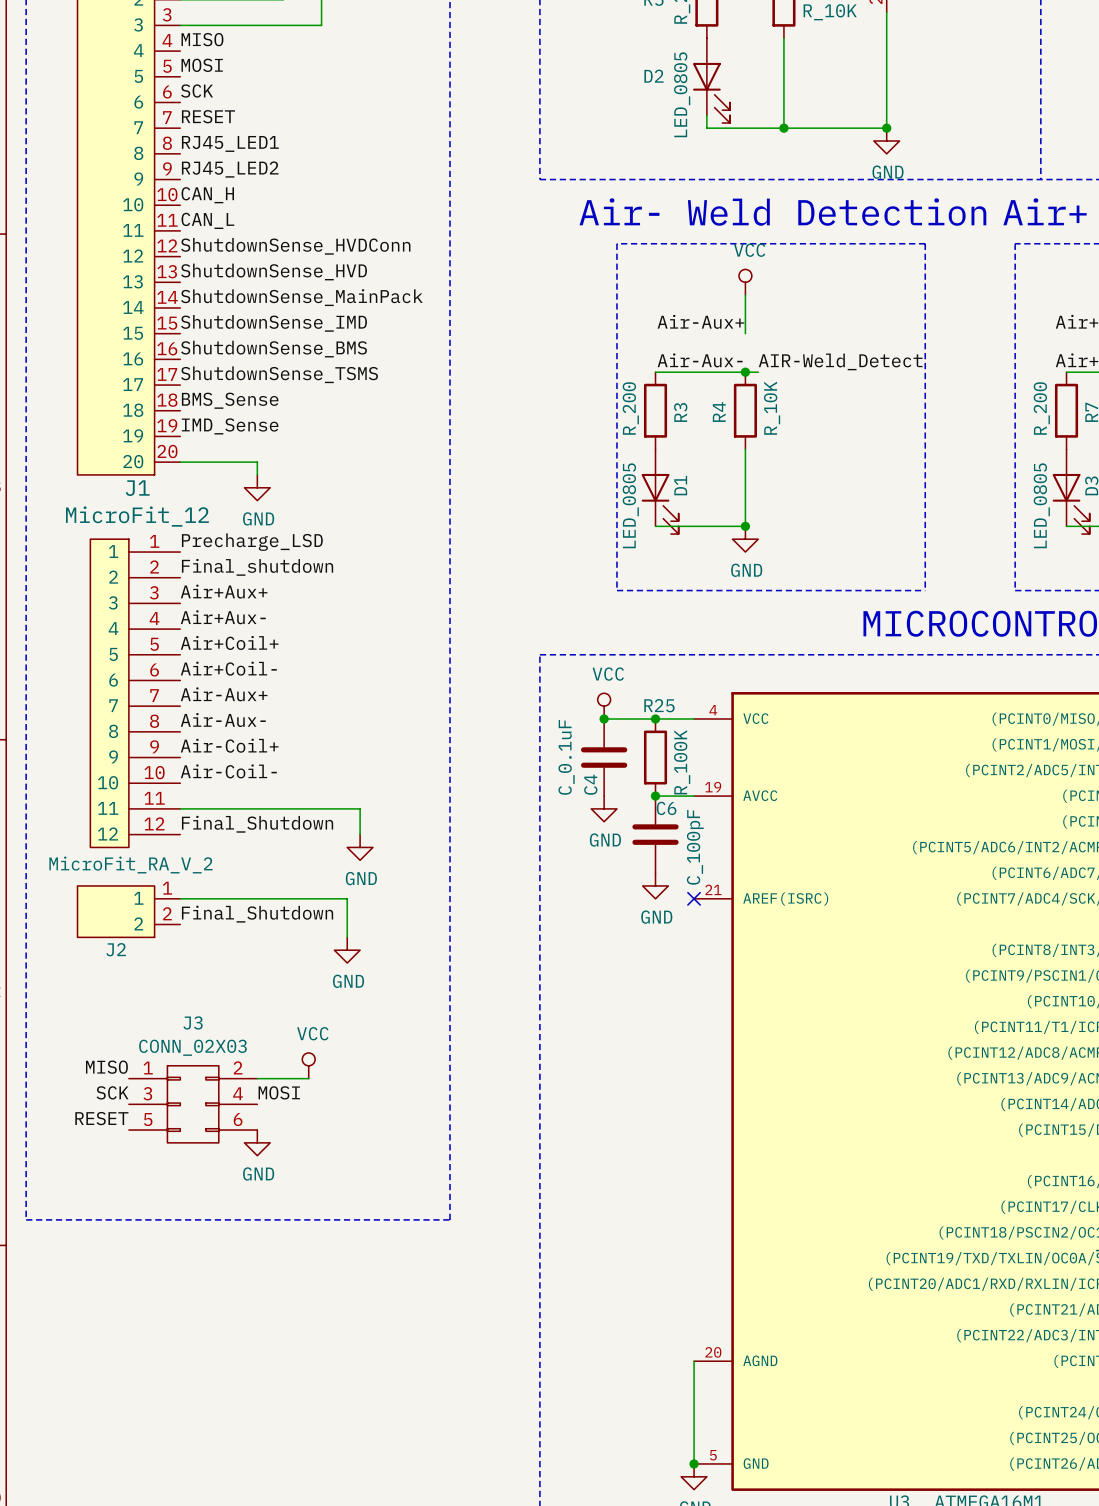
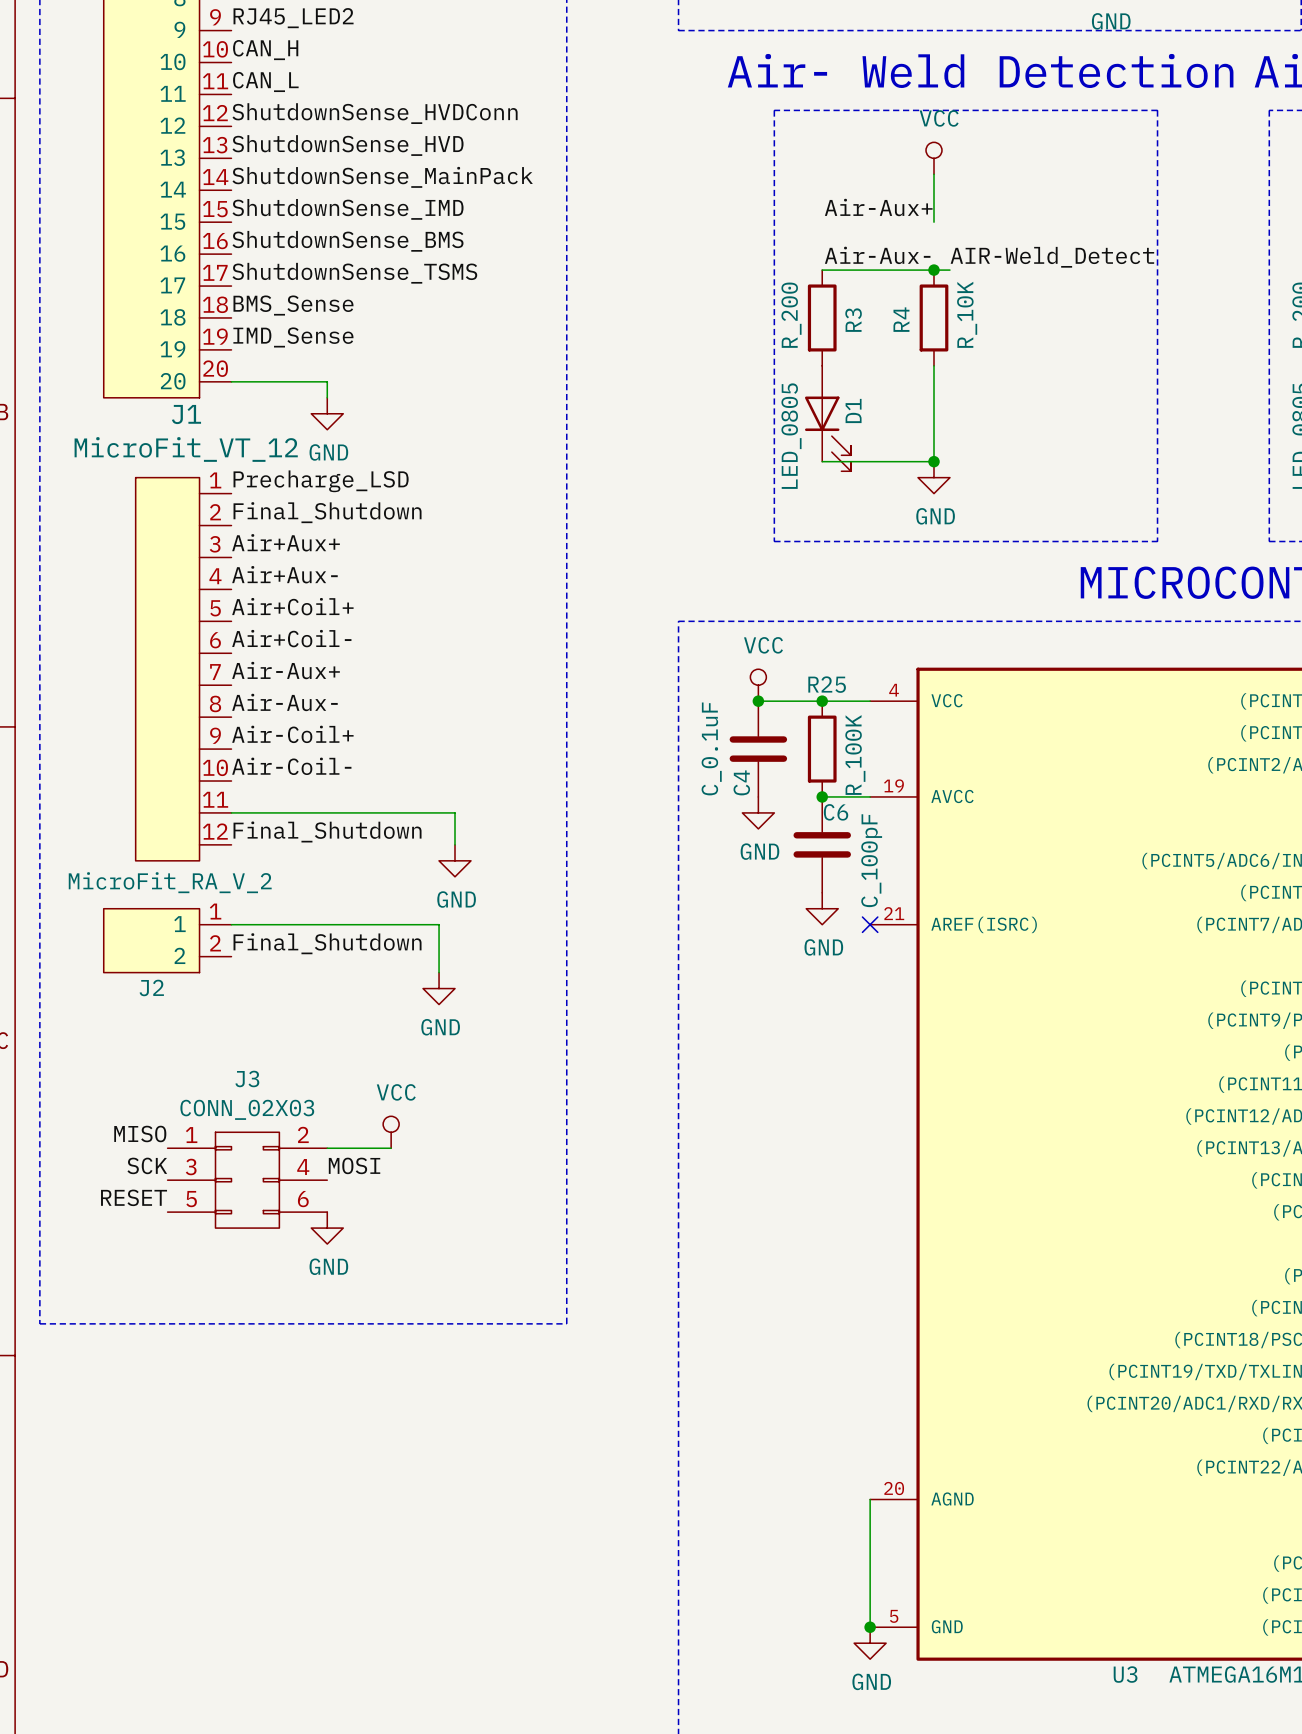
J1 value: MicroFit_12 (137, 516) -> MicroFit_VT_12 (186, 449)
J1 symbol: [90, 539, 181, 848] -> [135, 477, 232, 861]
label: Final_shutdown (257, 567) -> Final_Shutdown (327, 512)

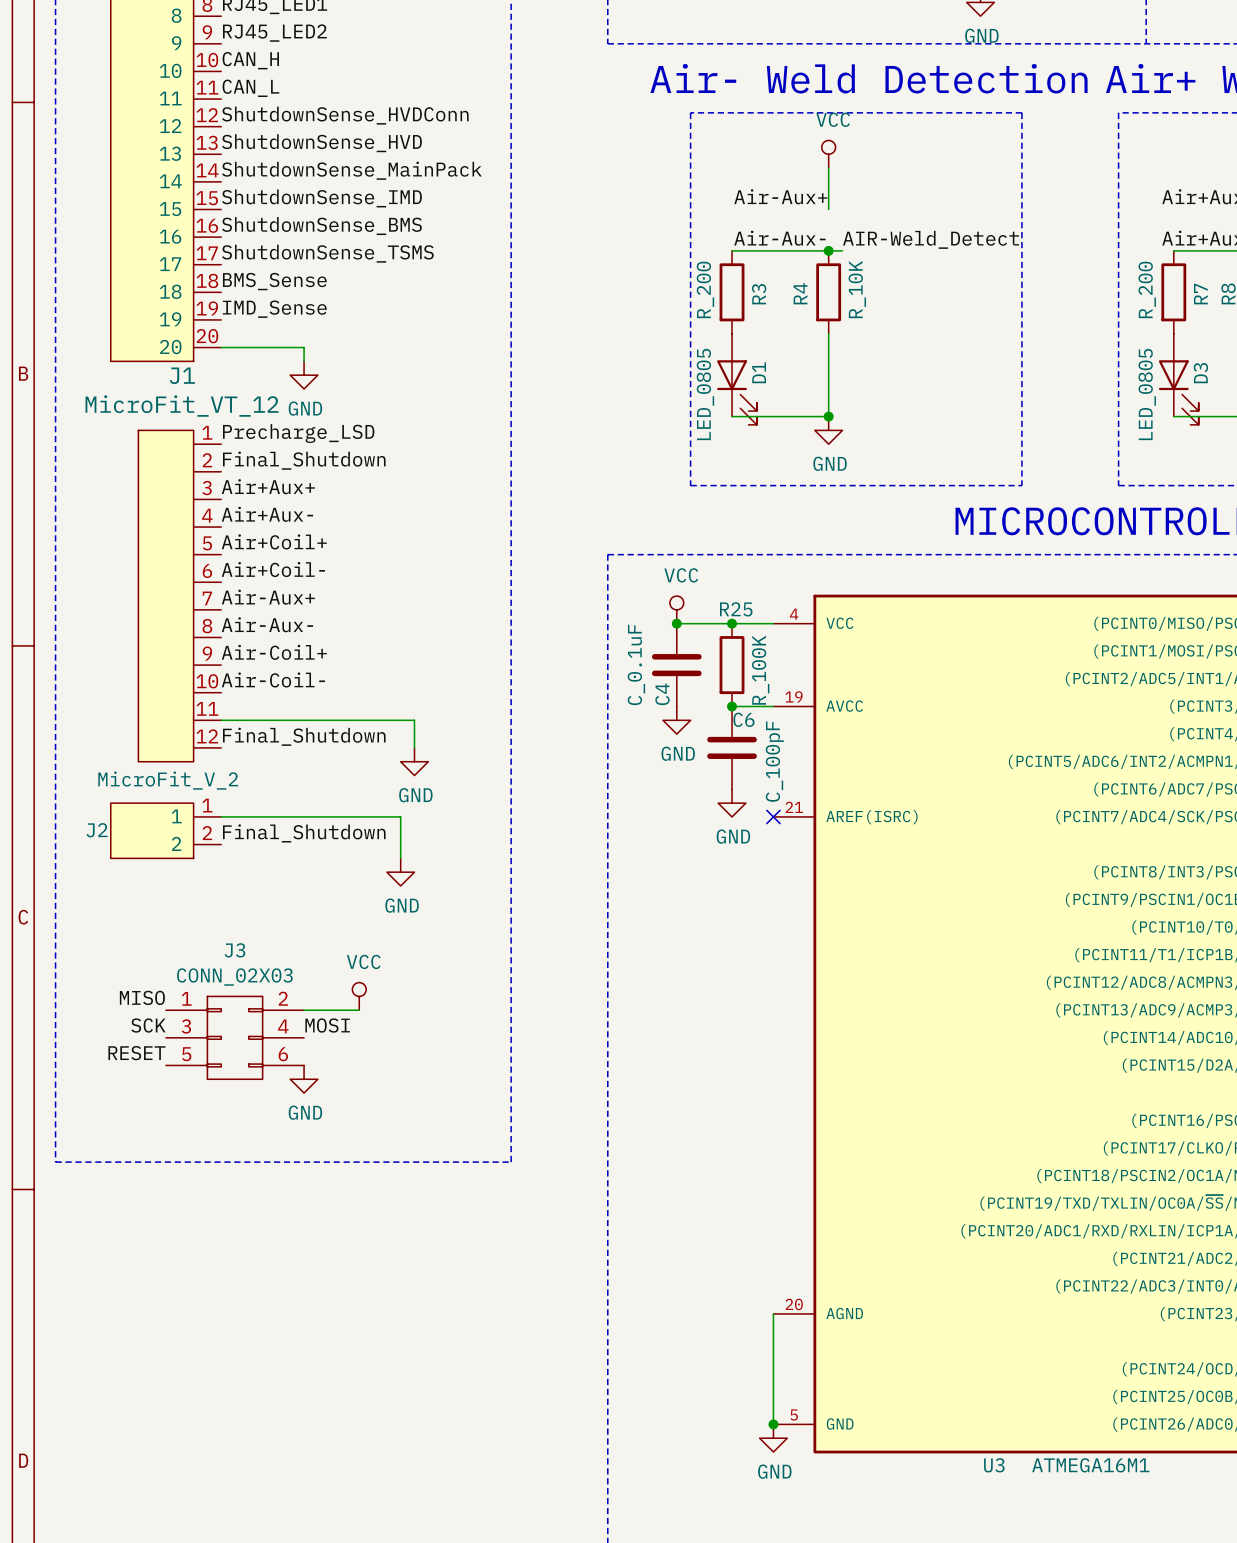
J2 value: MicroFit_RA_V_2 (170, 882) -> MicroFit_V_2 (168, 780)
J2 name position: J2 (151, 987) -> J2 (97, 830)

